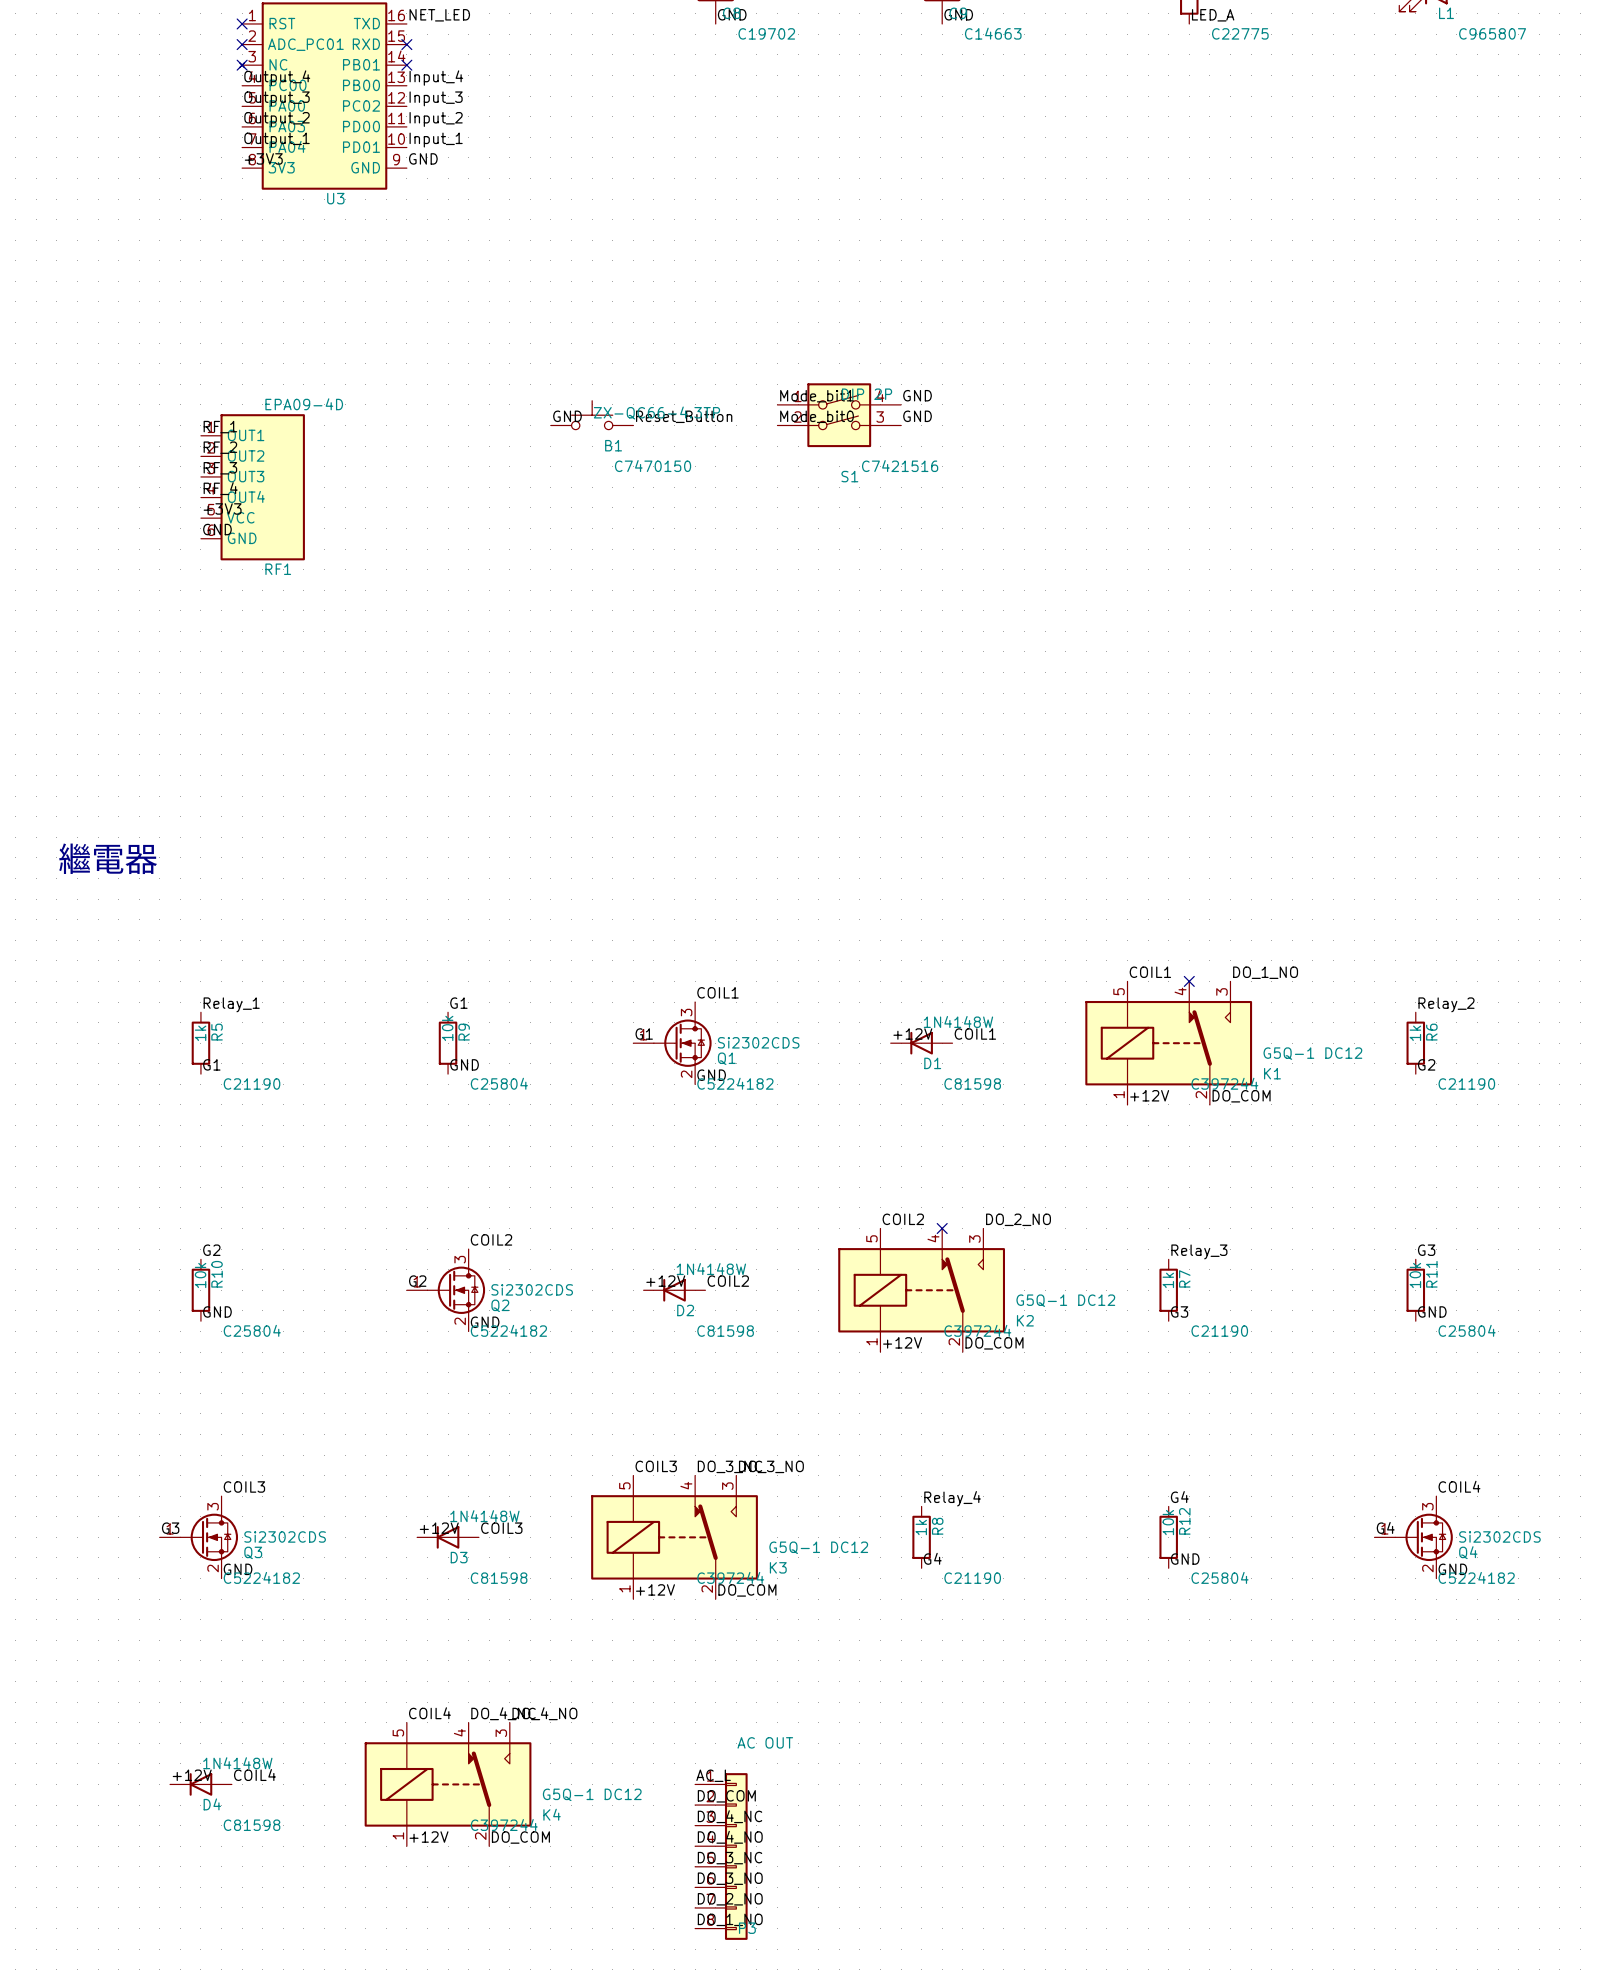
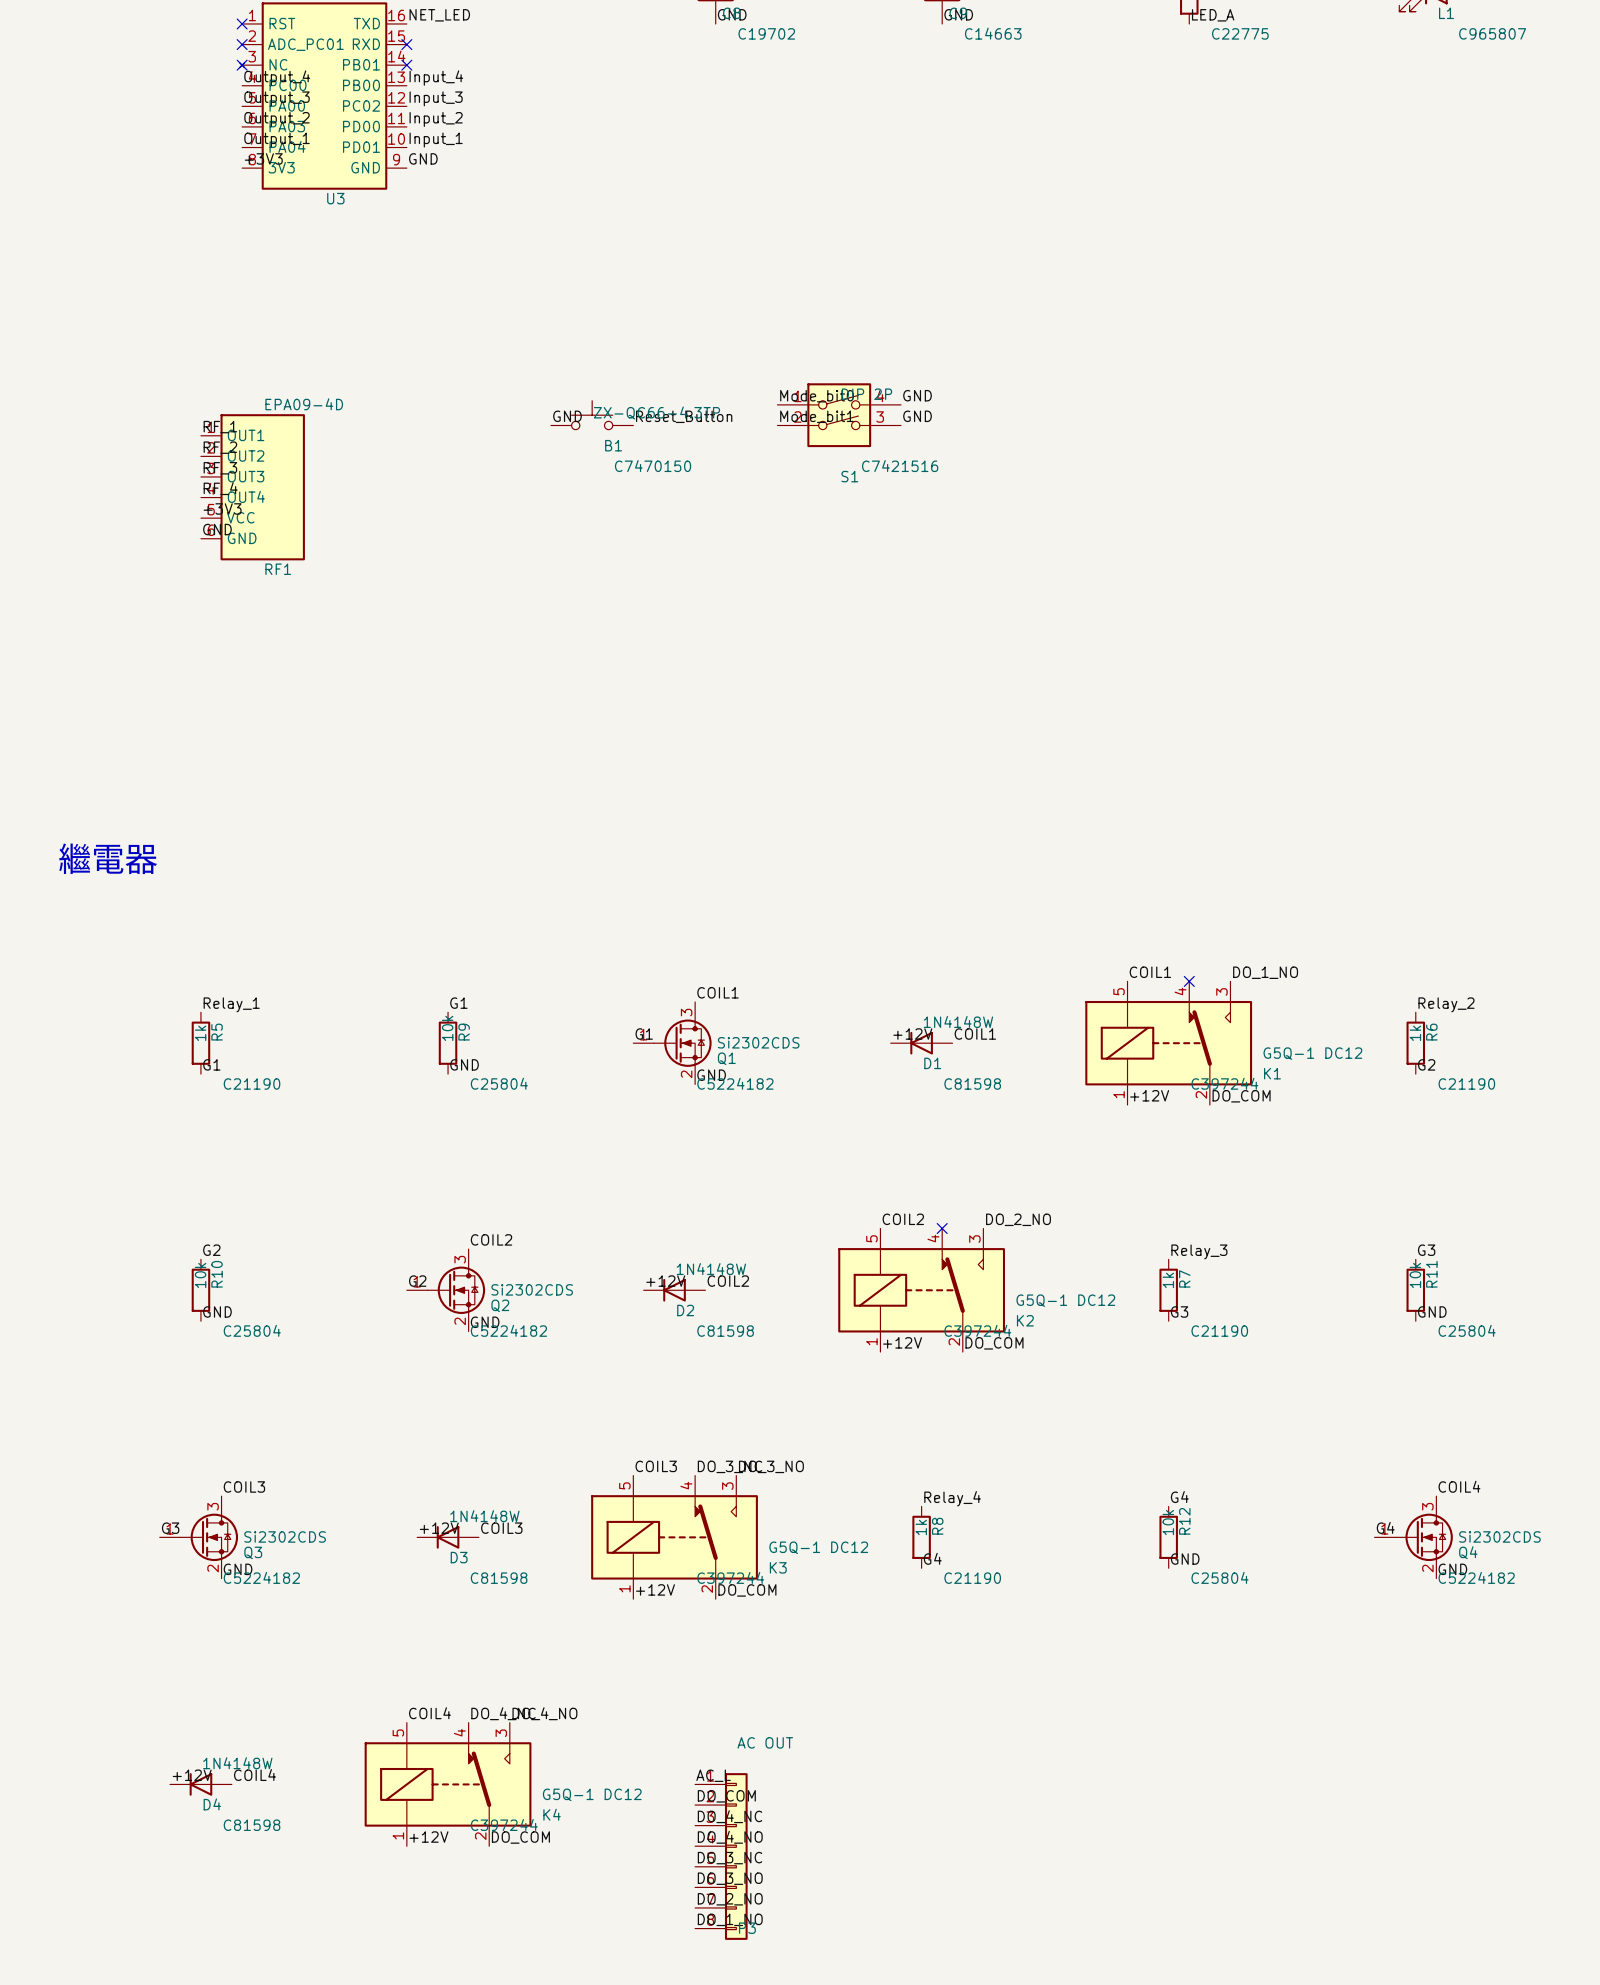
label: Mode_bit1 (817, 396) -> Mode_bit0 (817, 396)
label: Mode_bit0 (817, 416) -> Mode_bit1 (817, 416)

